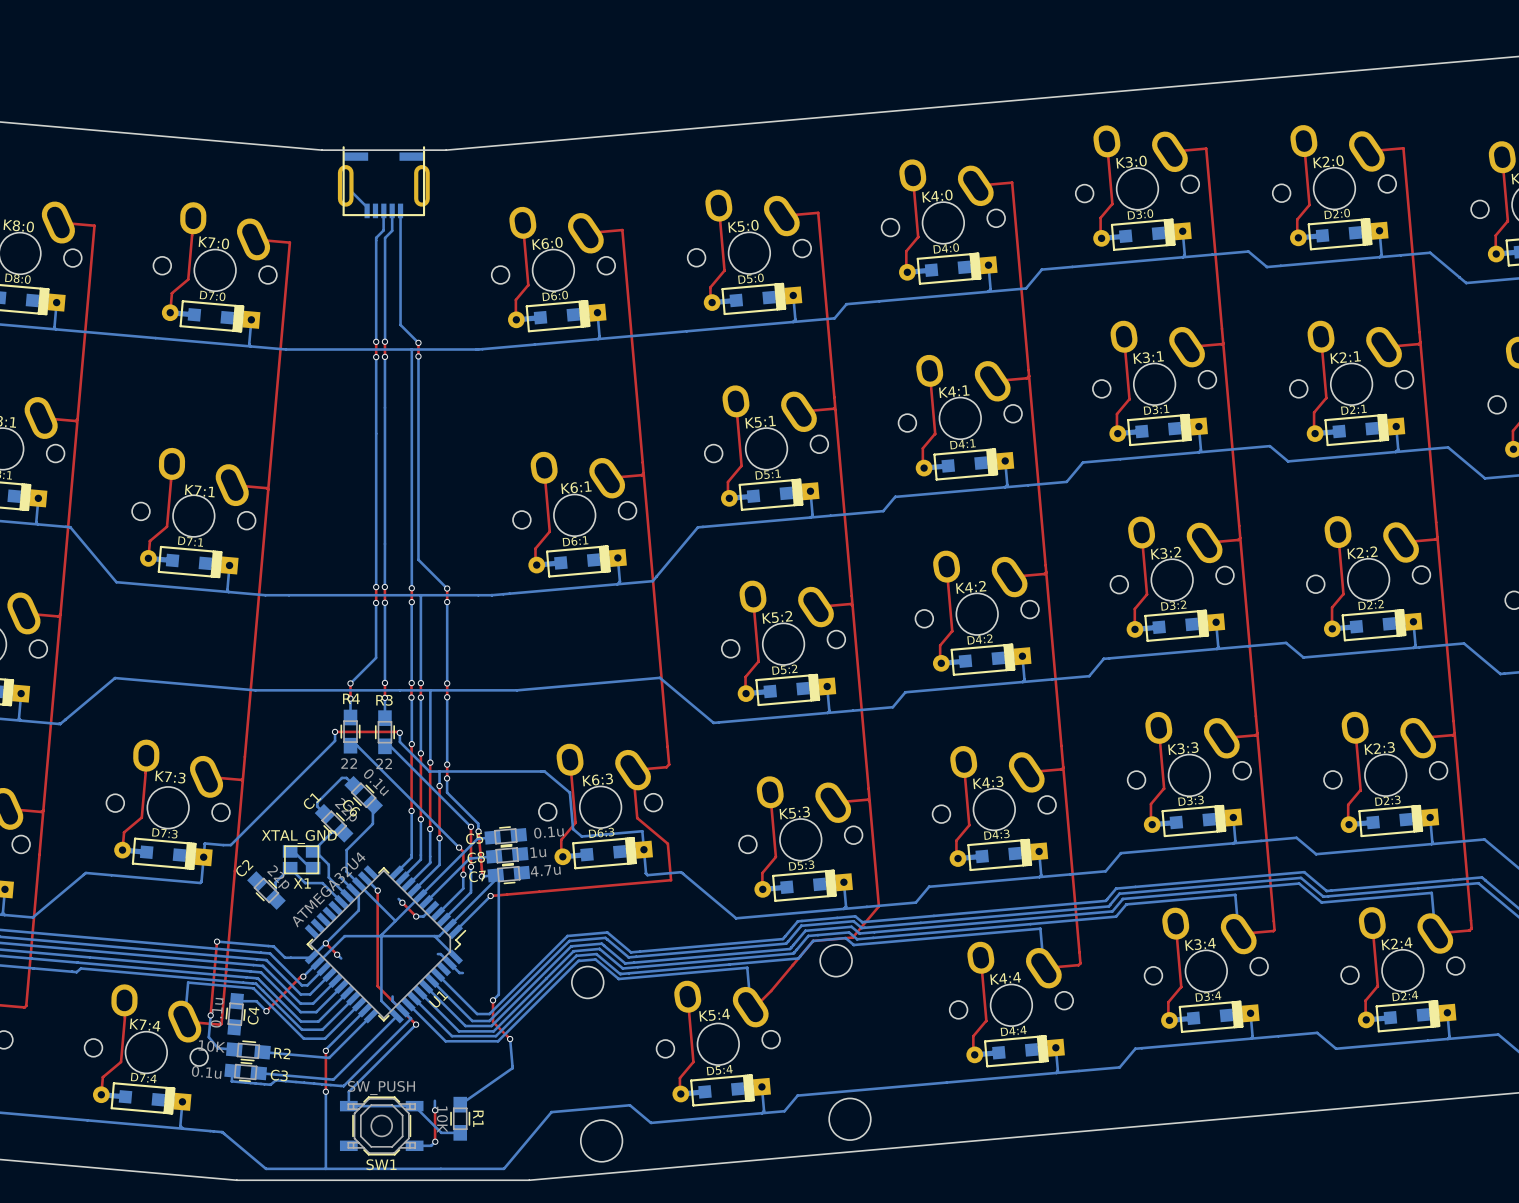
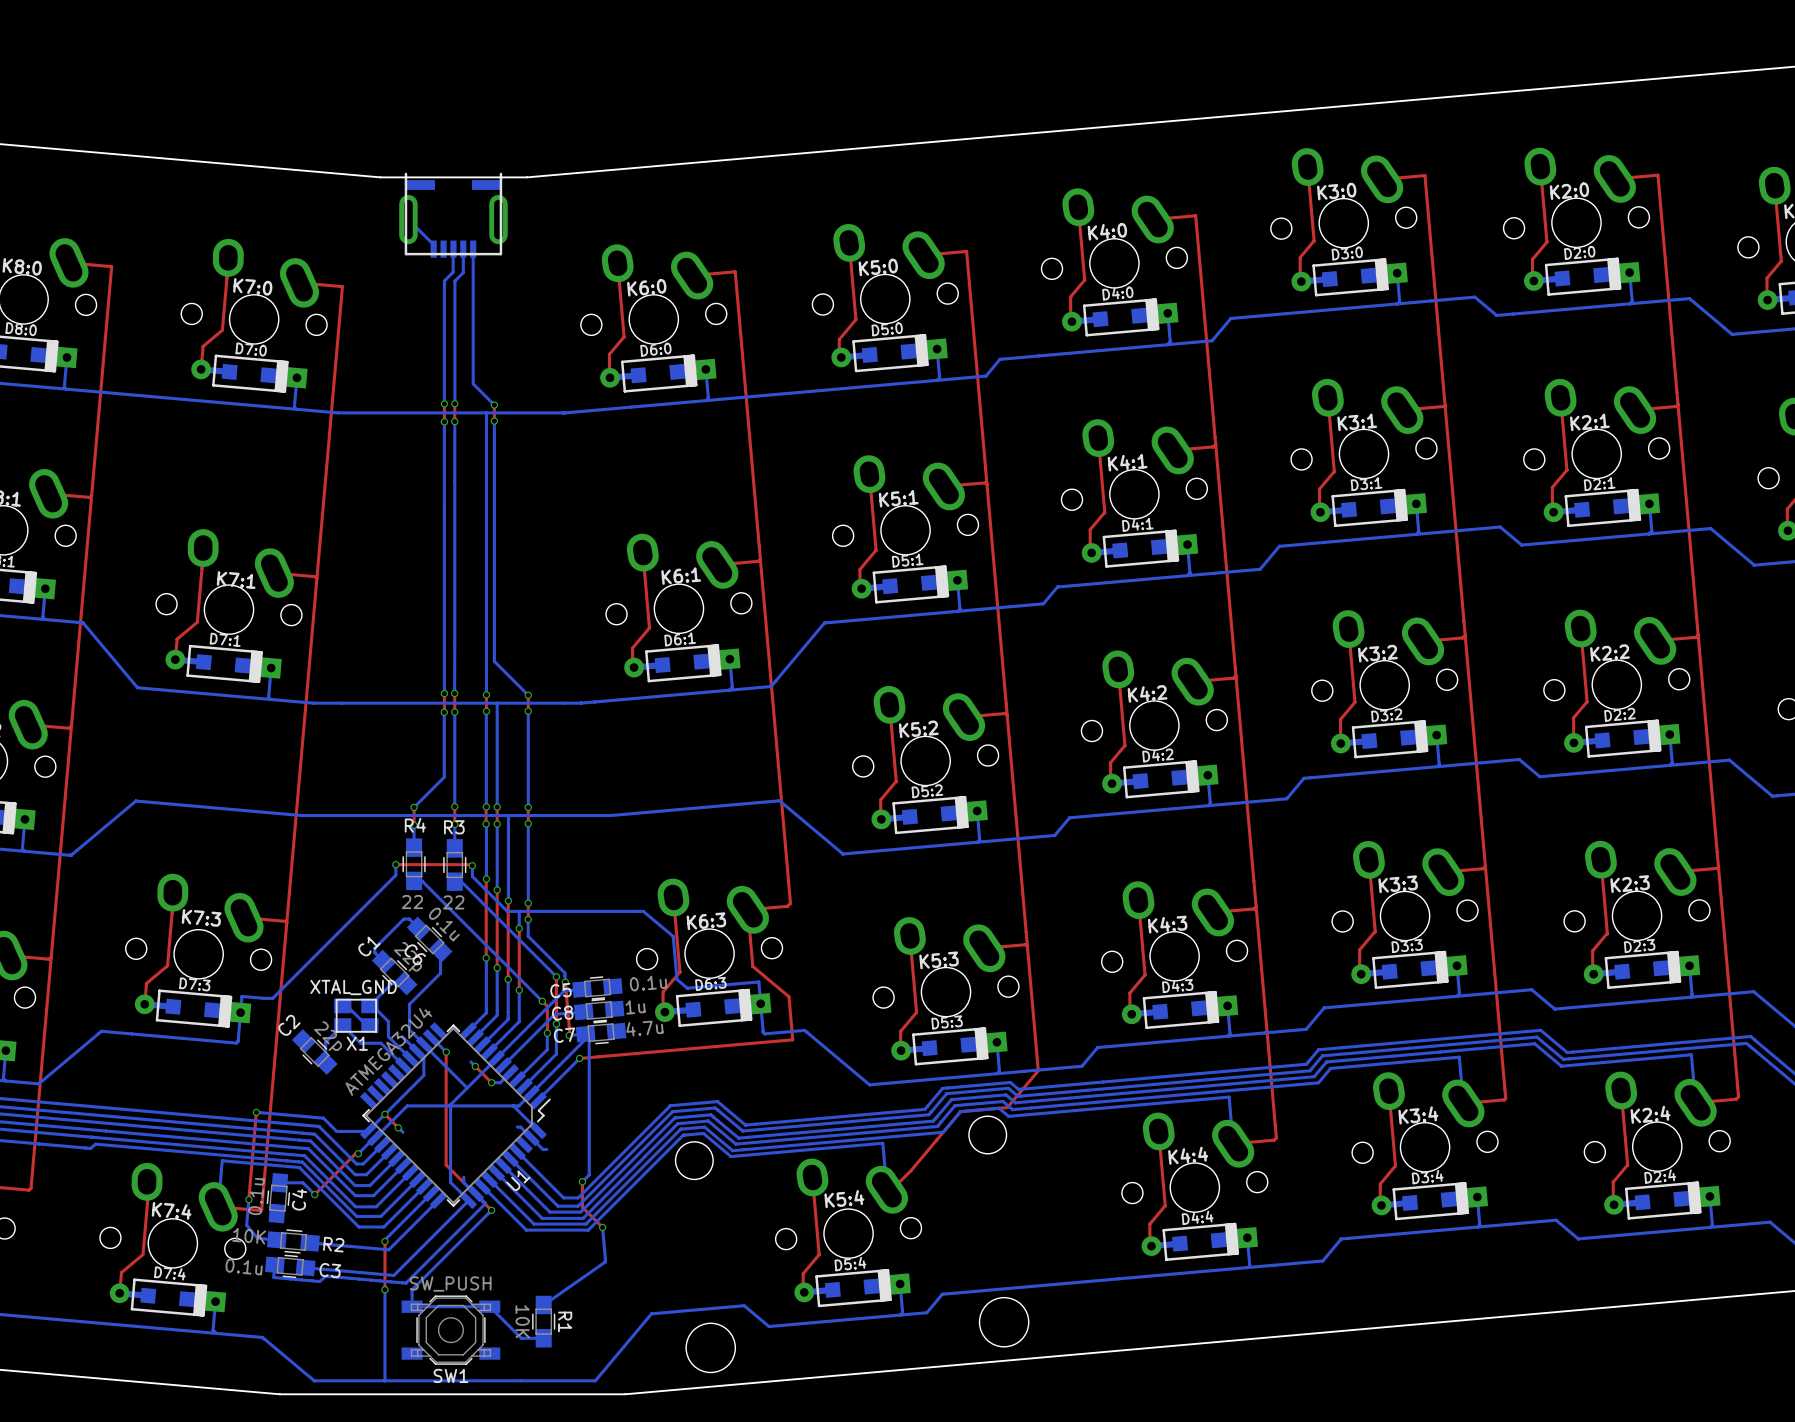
bottom track: (434, 1100) (435, 1110) -> none
top track: (435, 1110) (435, 1141) -> none
via: (435, 1110) -> none
bottom track: (435, 1141) (431, 1145) (414, 1145) -> none
via: (435, 1141) -> none

